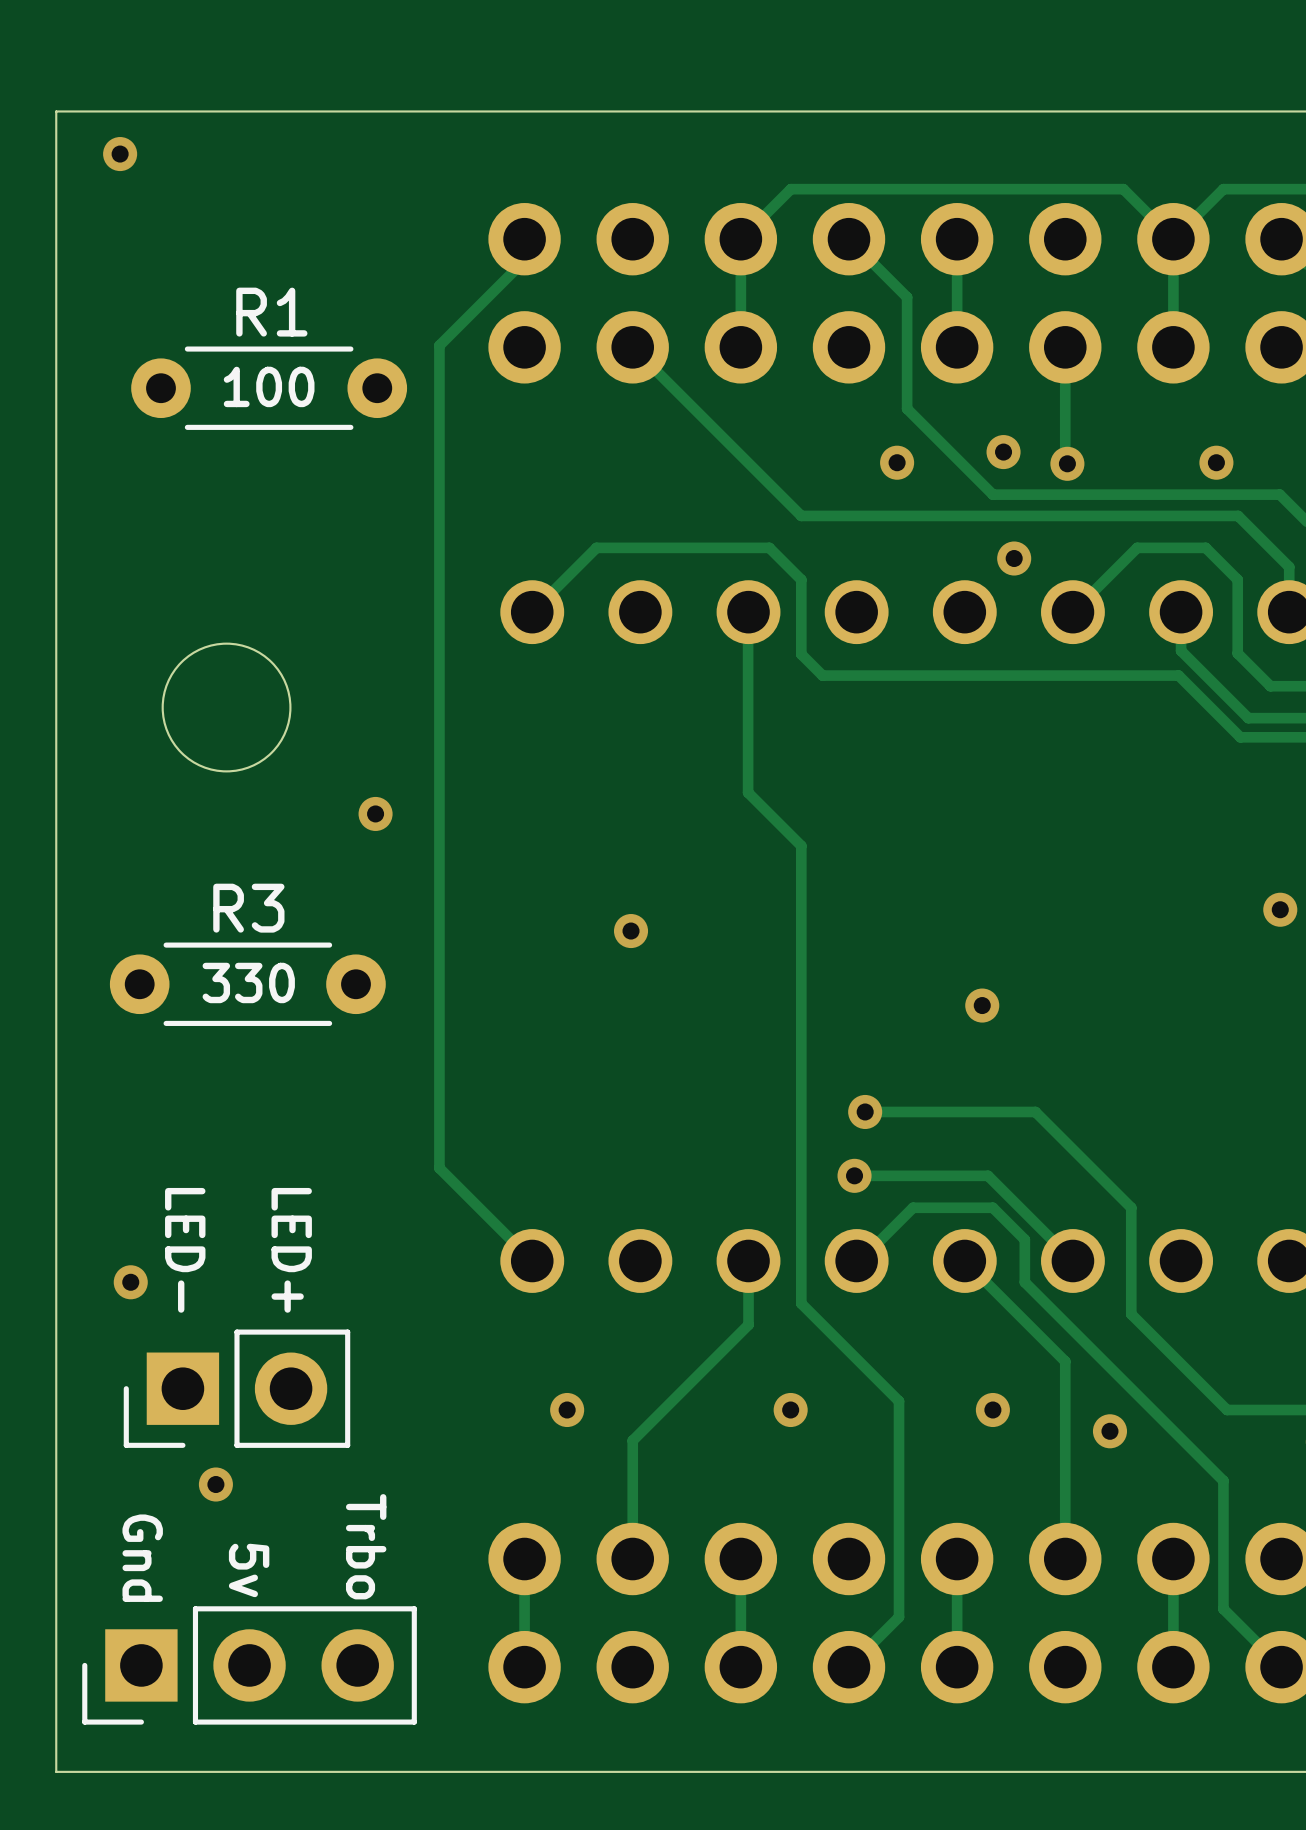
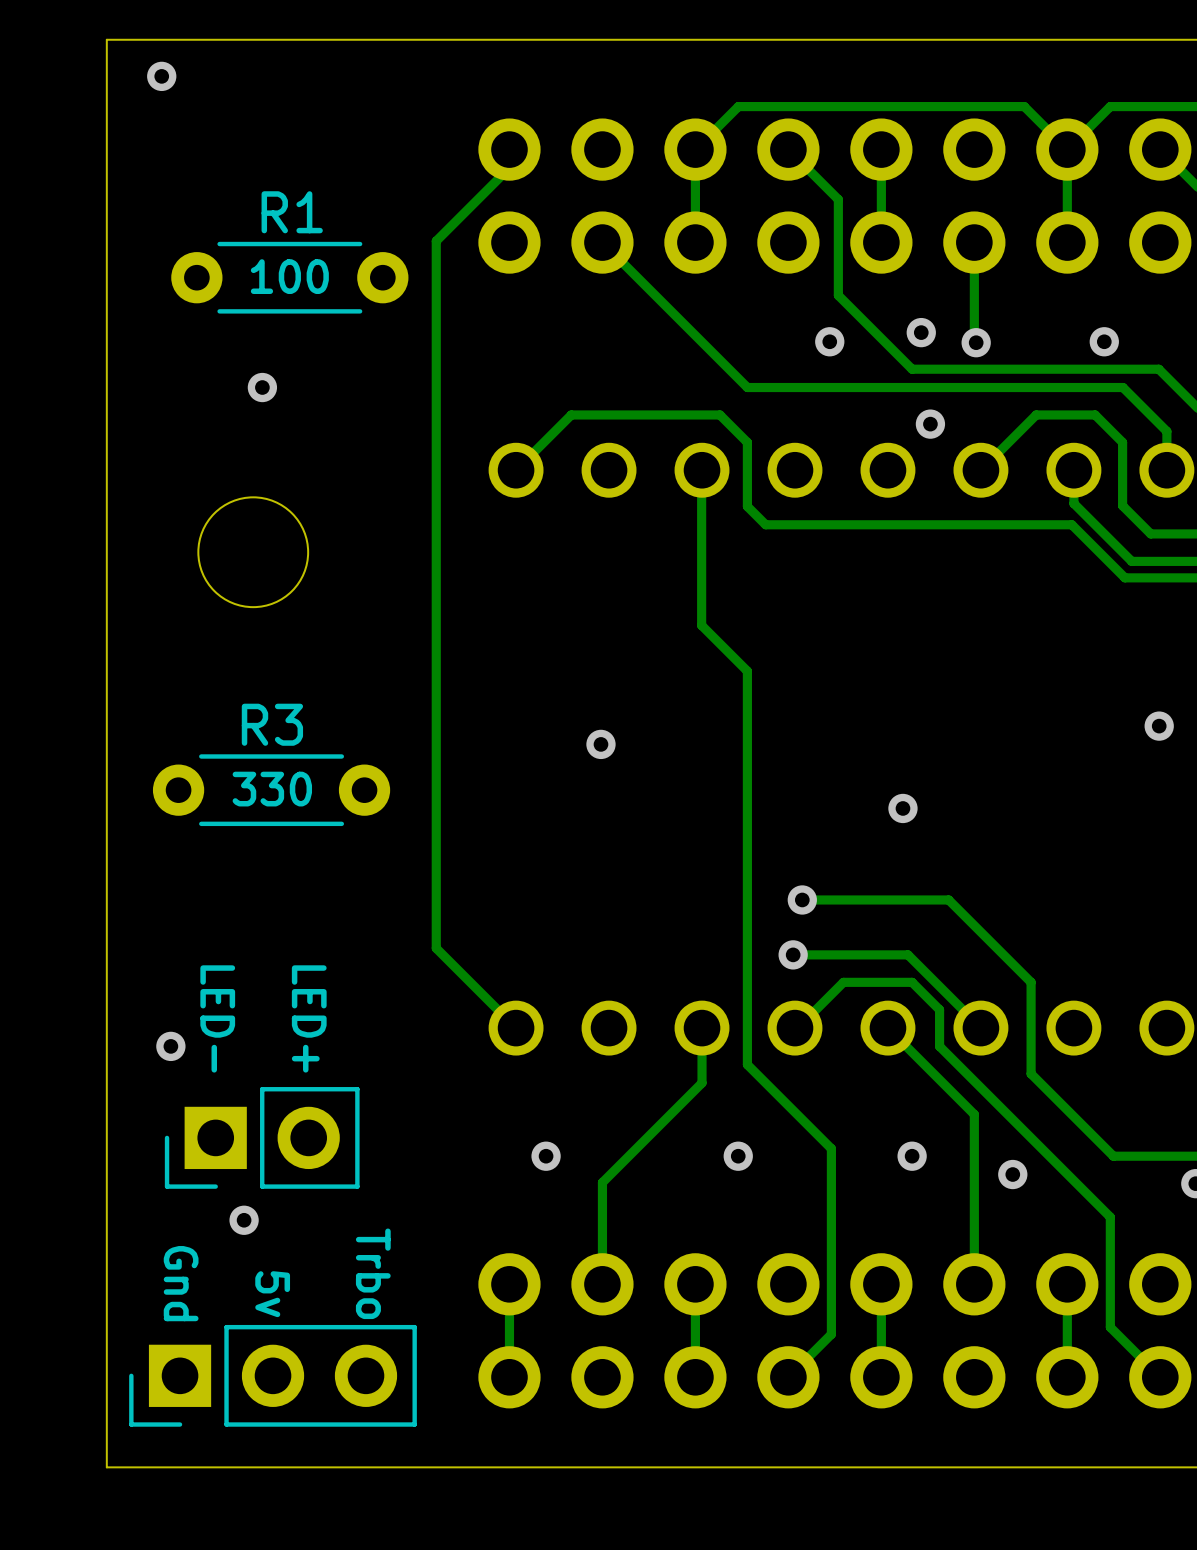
via: none -> (262, 387)
via: (375, 813) -> none

